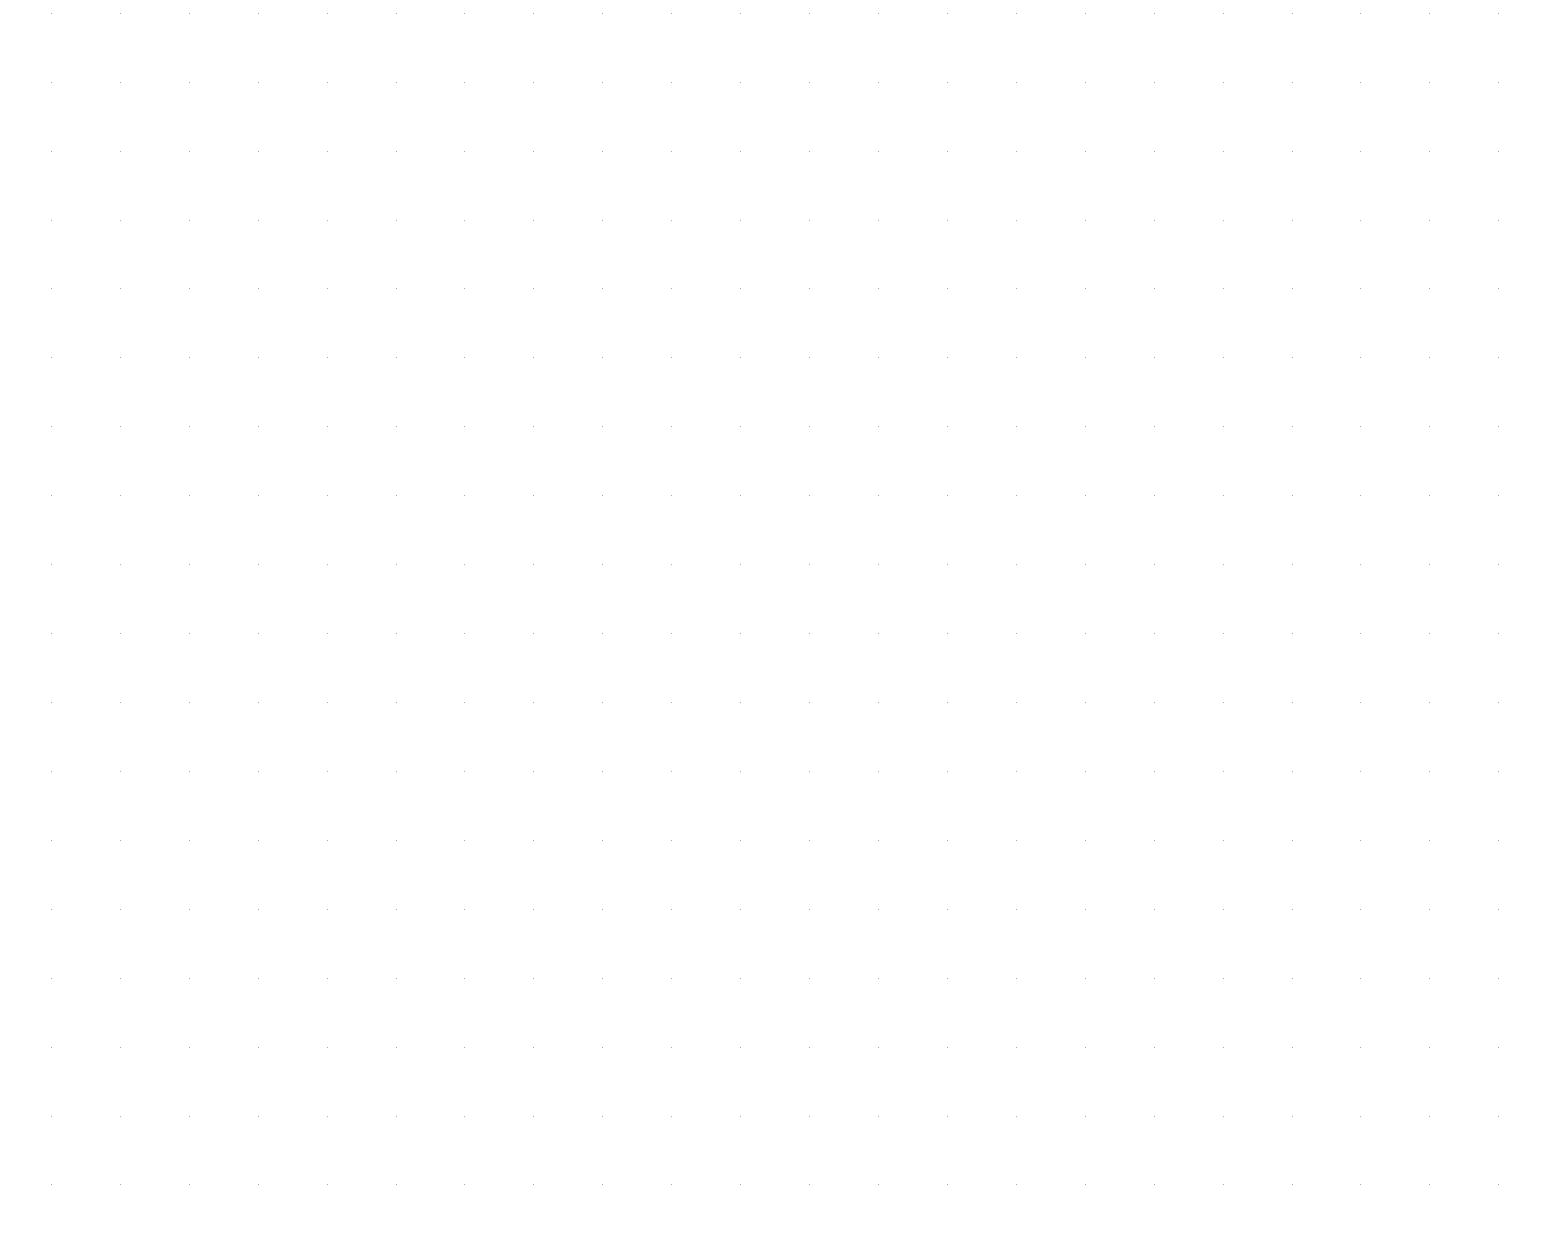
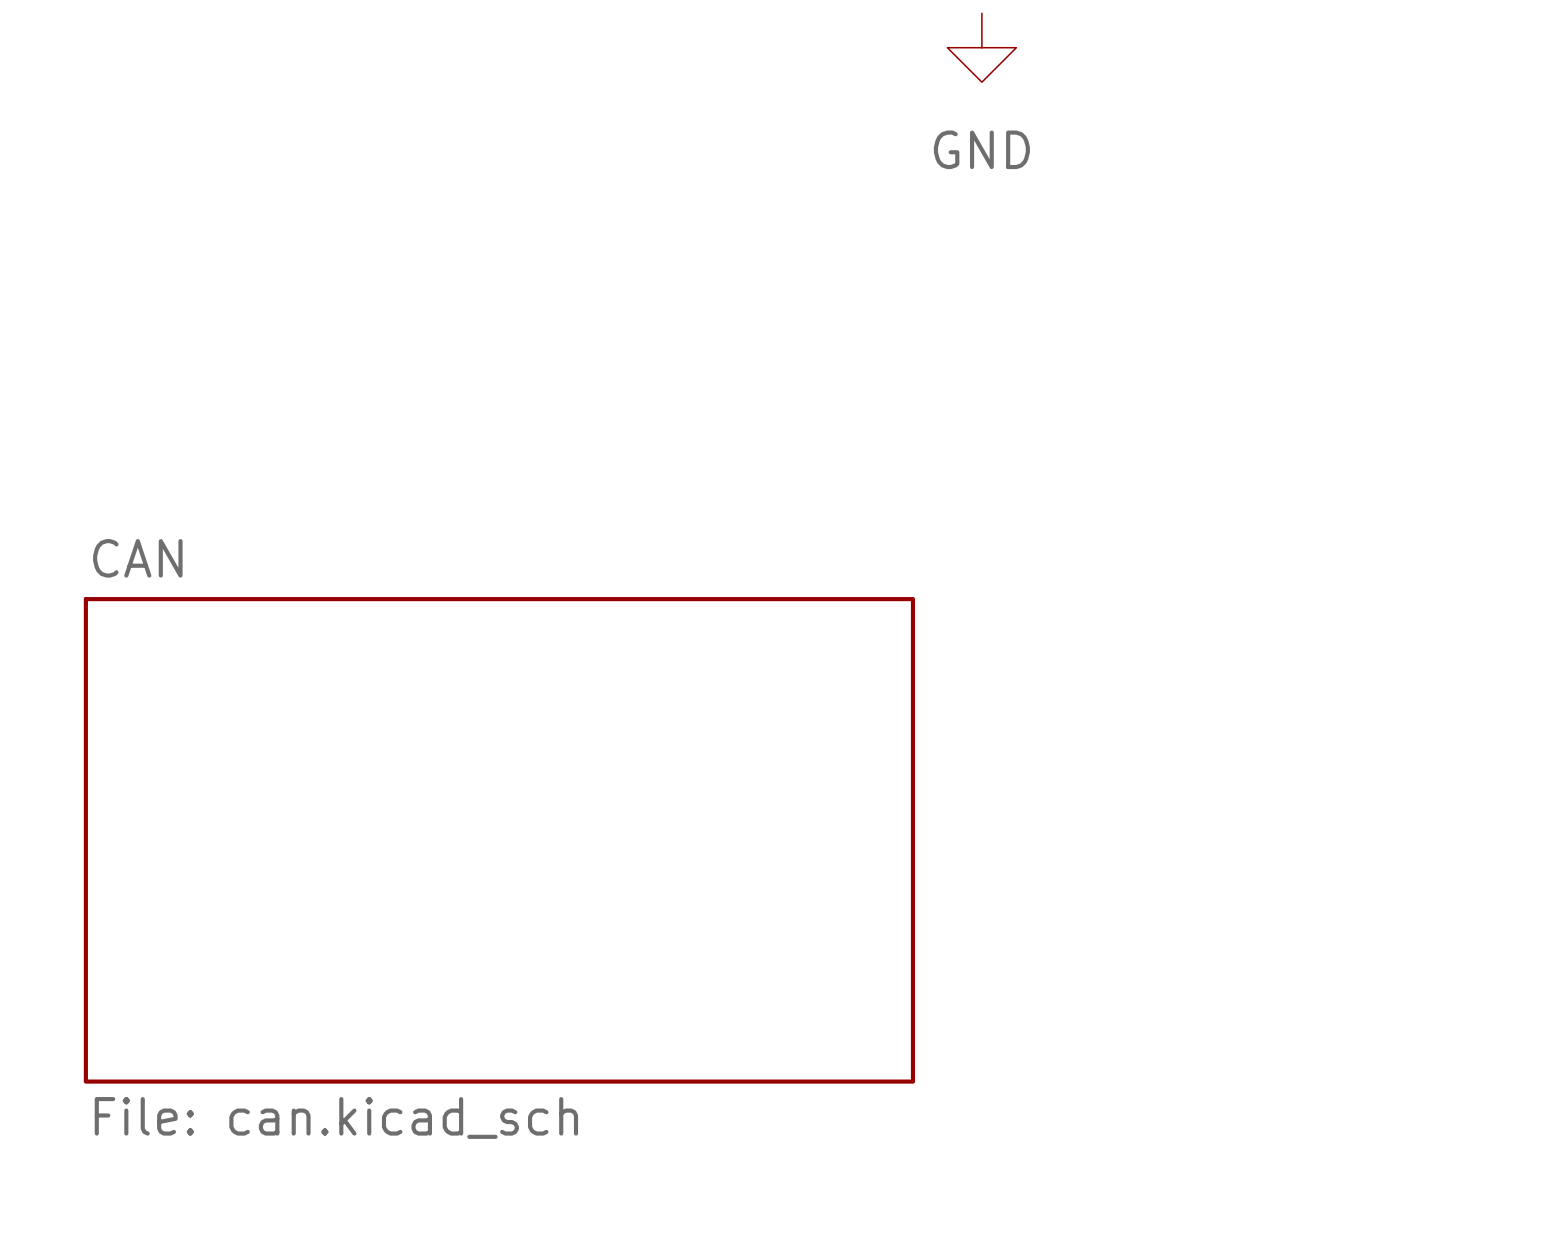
power symbol: none -> GND (981, 47)
sheet CAN: none -> File: can.kicad_sch (499, 840)

